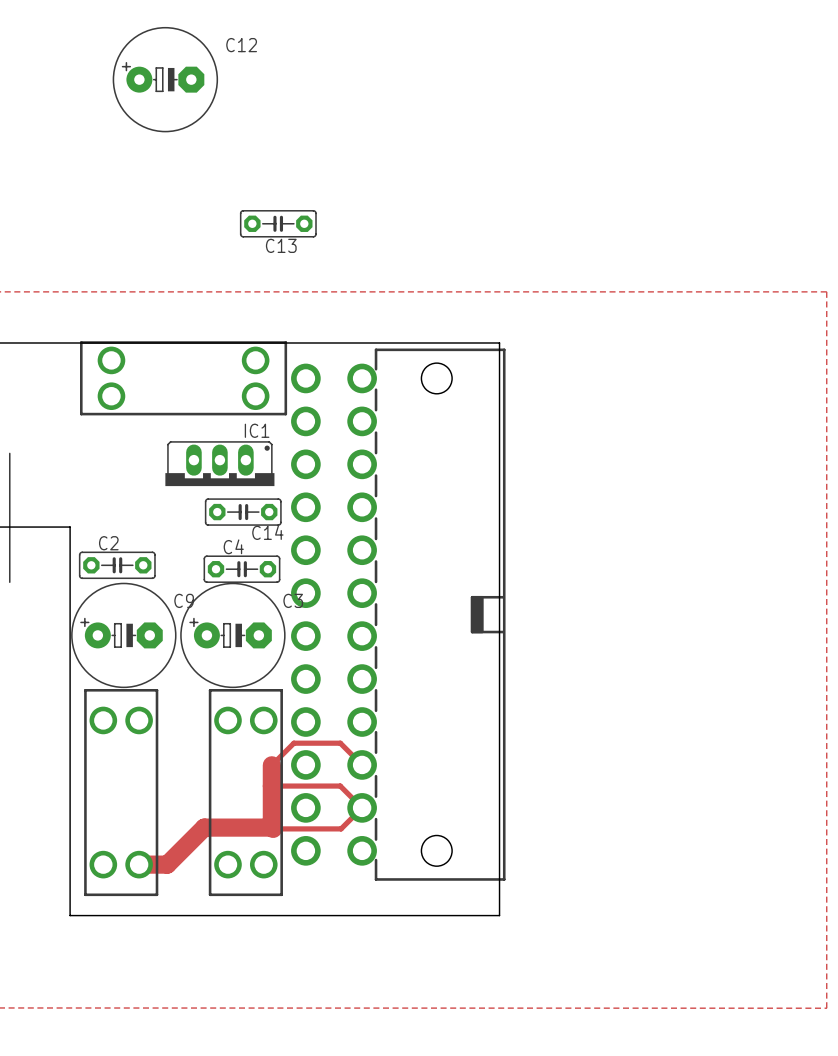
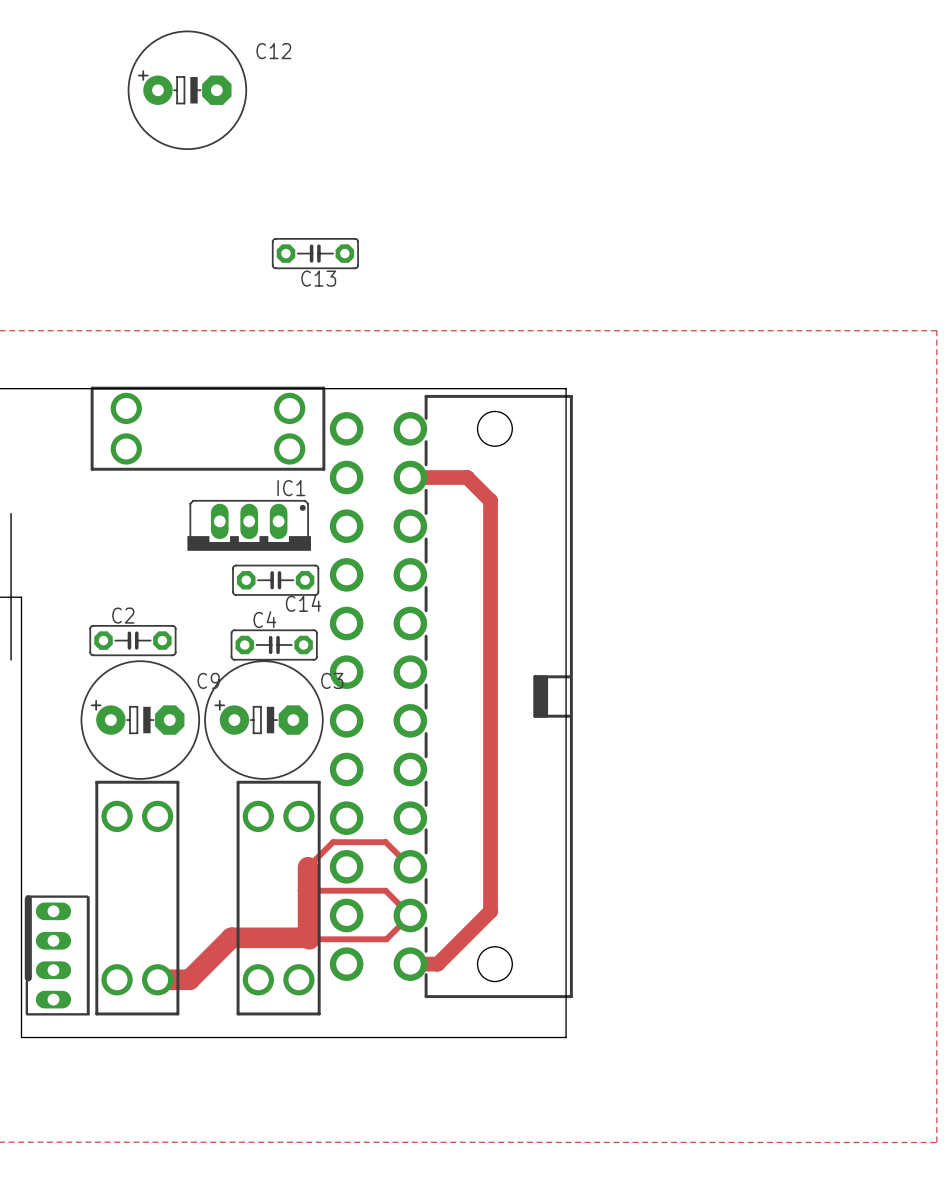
track: none -> (410, 477) (467, 477) (490, 500) (490, 911) (437, 964) (410, 964)
board edge: (18, 527) (70, 527) (70, 915) -> (21, 597) (21, 1037) (79, 1037)
part: none -> (57, 955)

